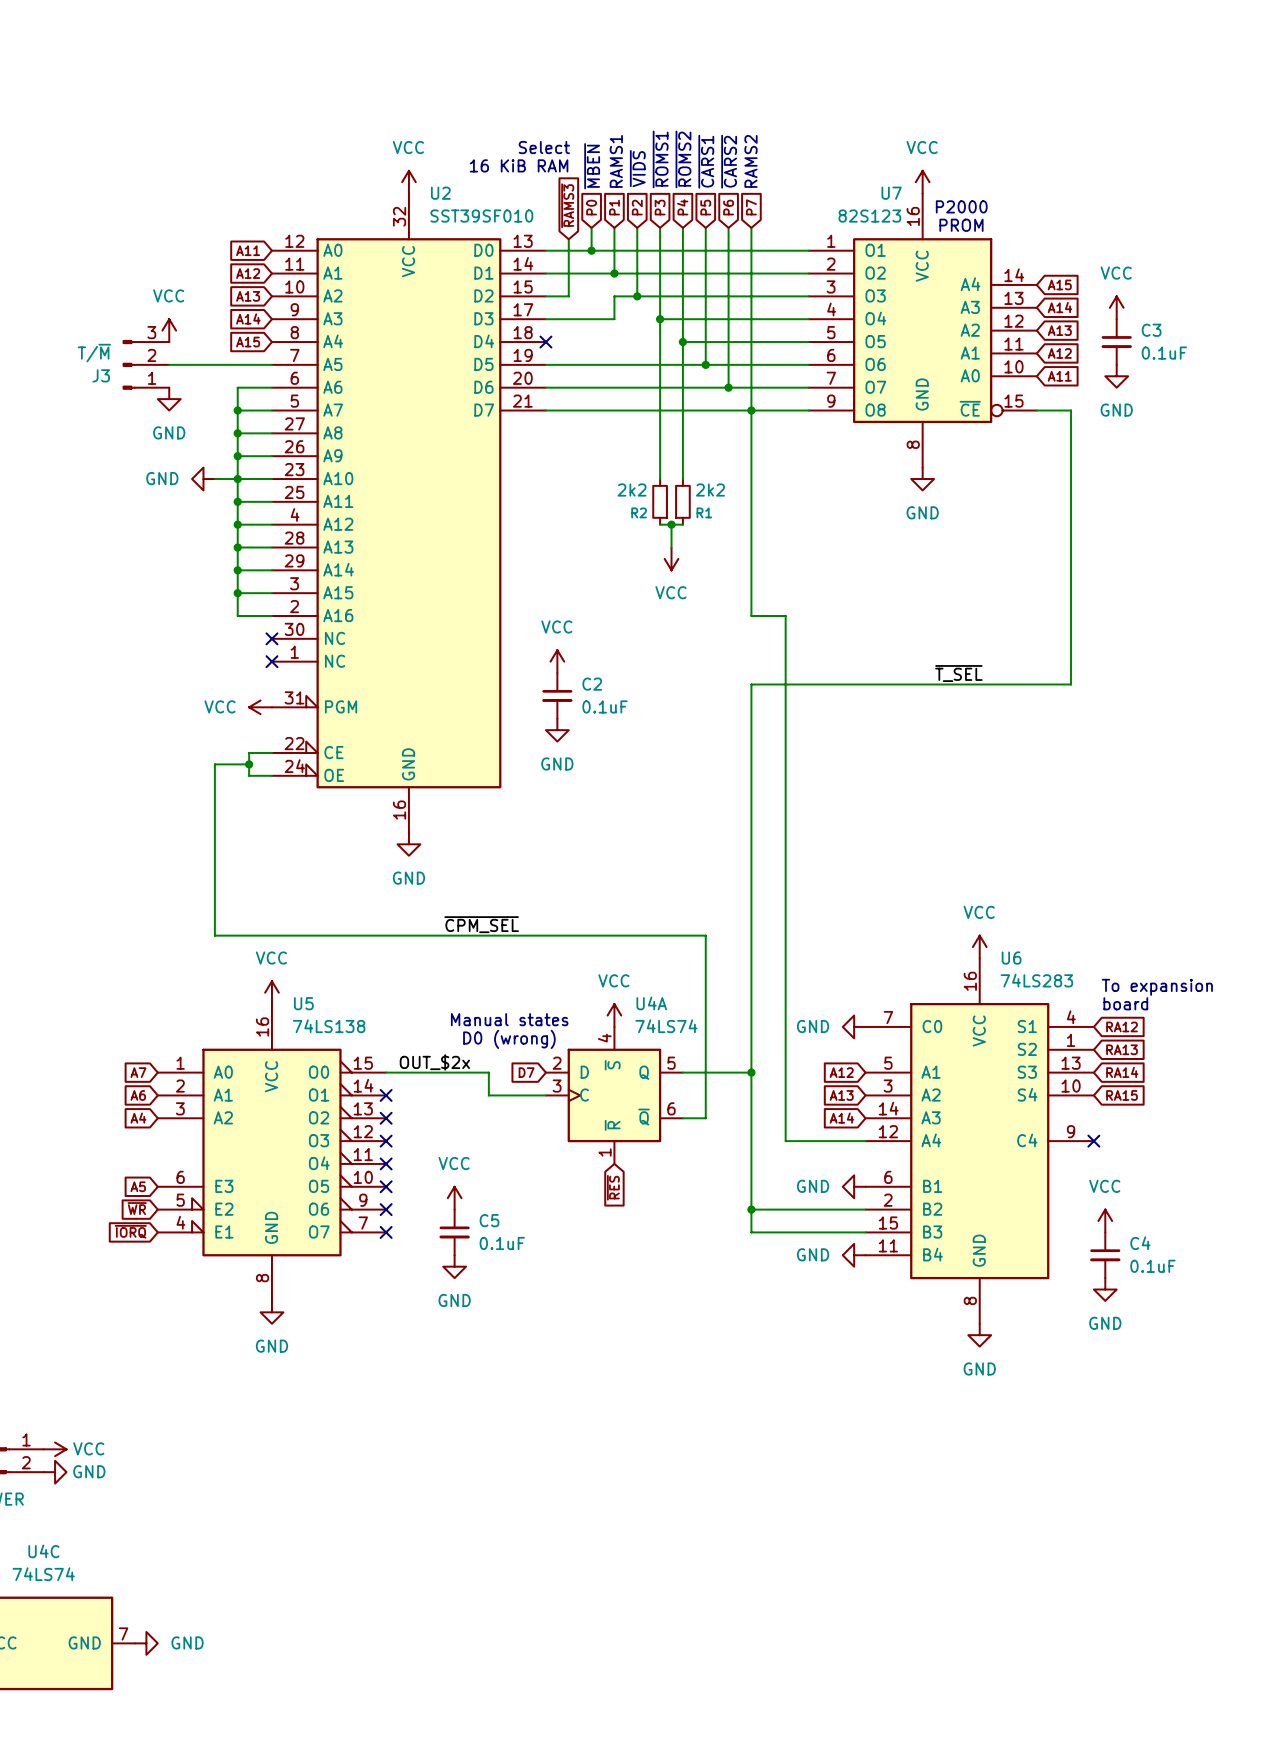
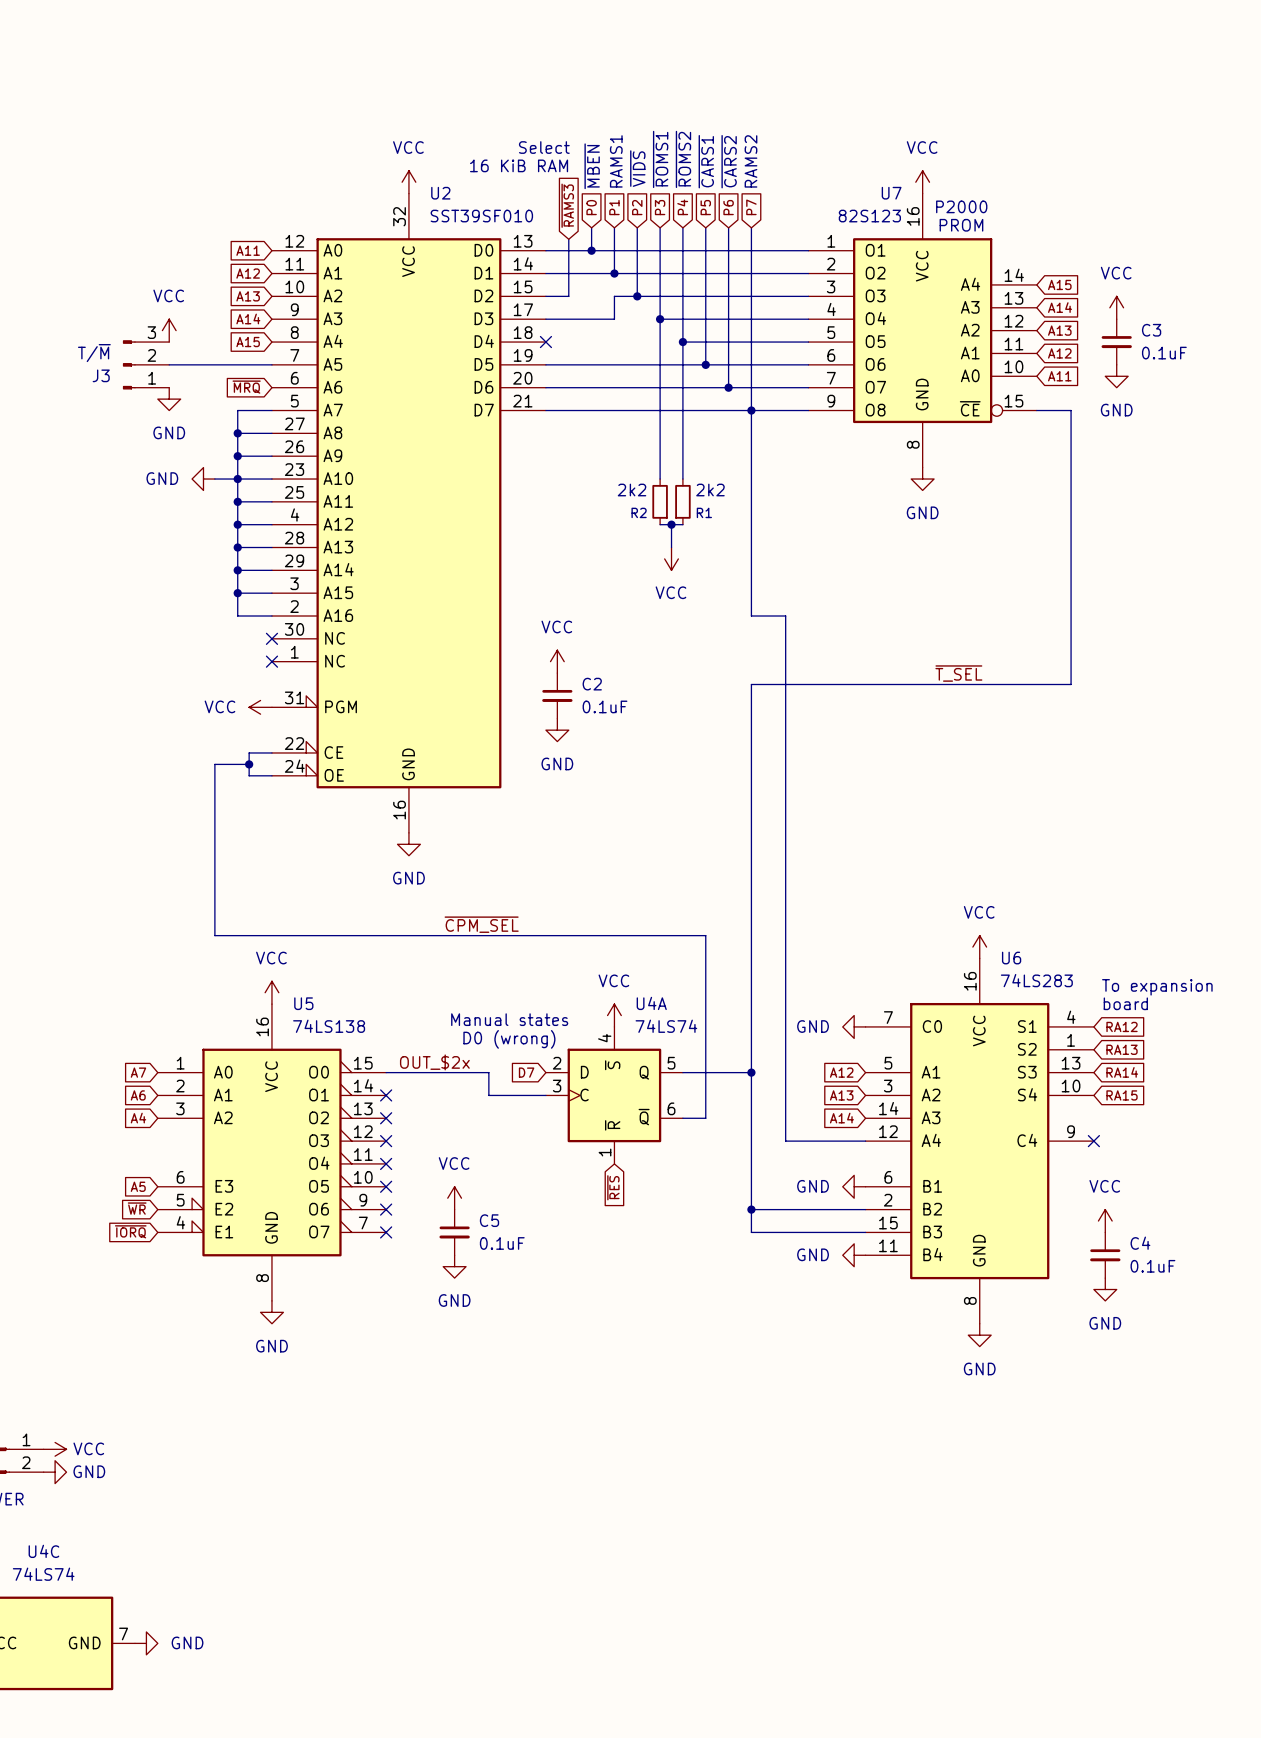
global label: none -> ~{MRQ} (246, 387)
wire: (271, 387) (237, 387) (237, 410) -> none
junction: (237, 410) -> none

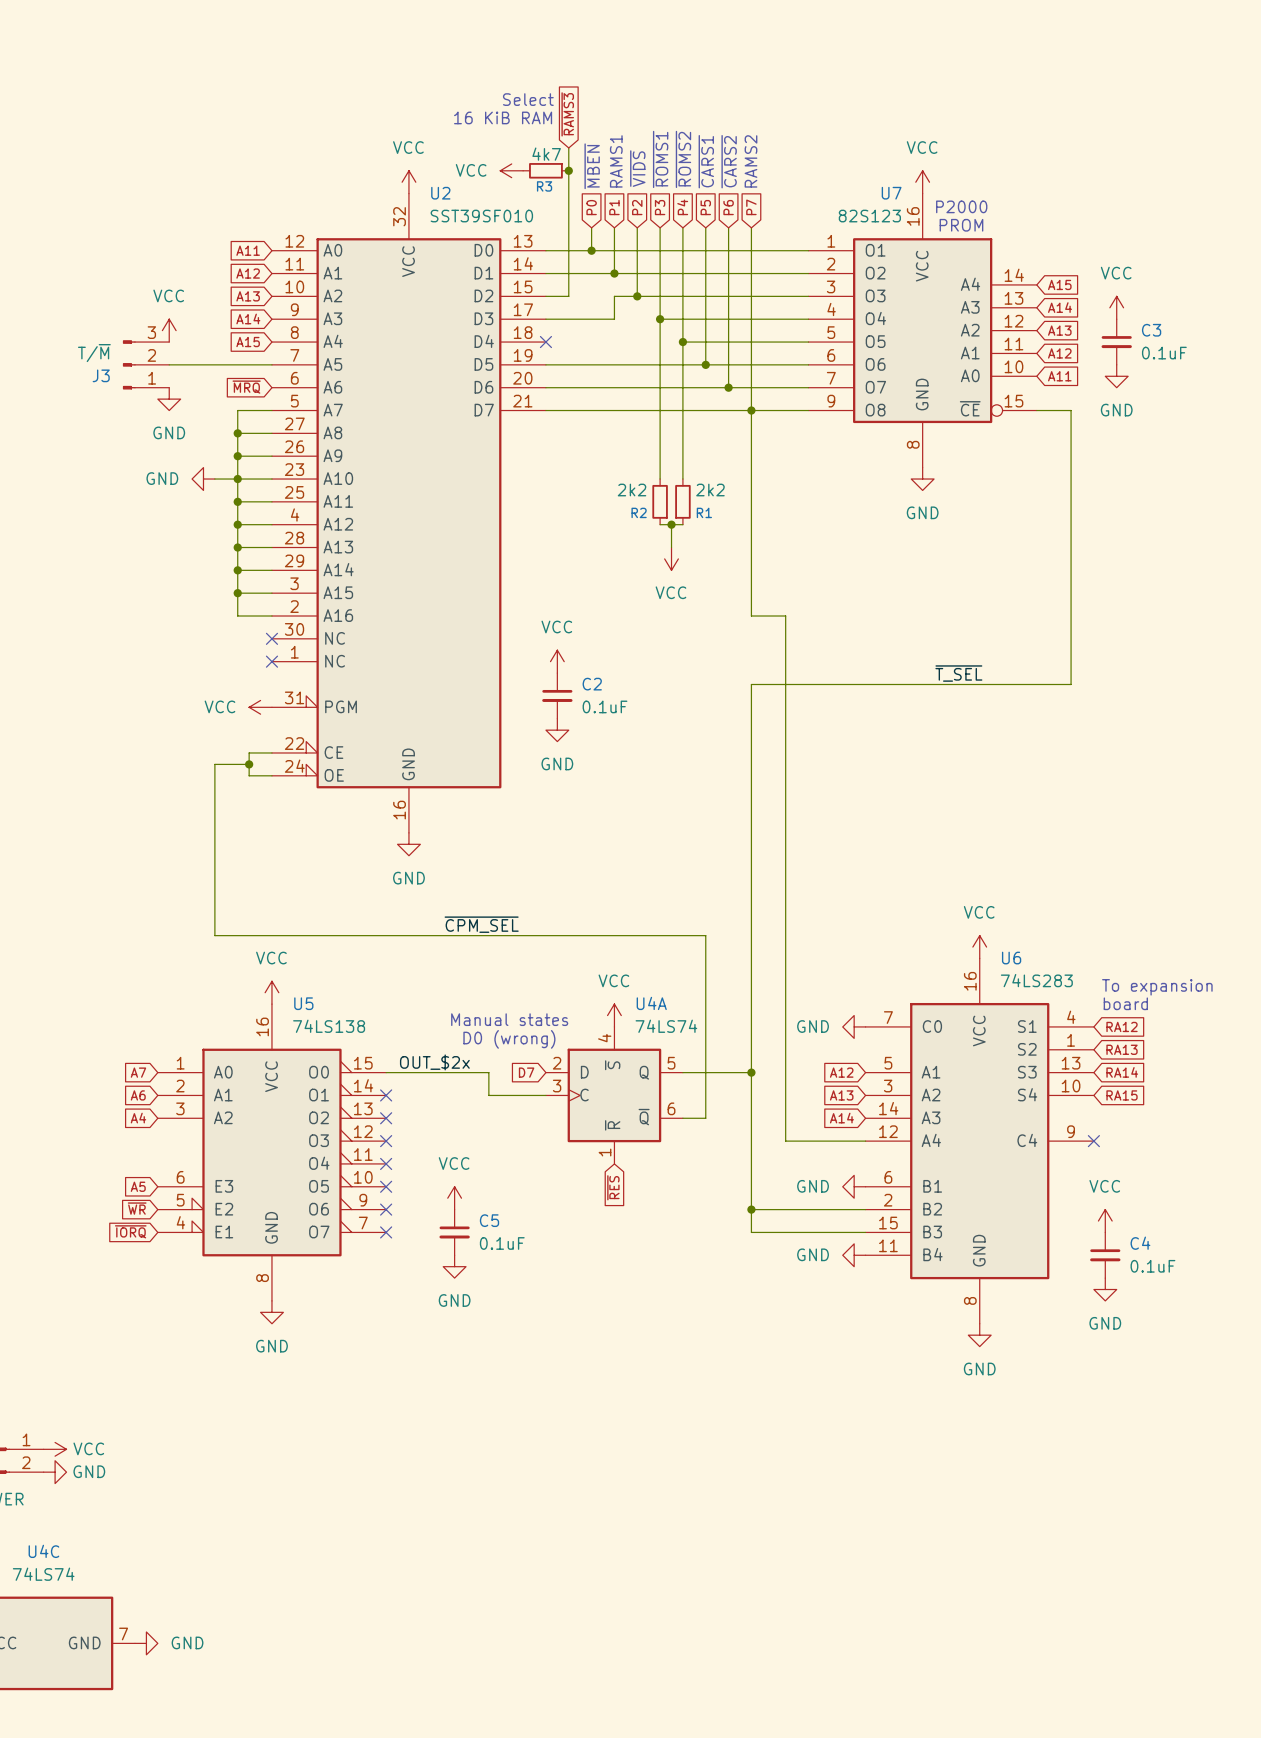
text position: Select (544, 147) -> Select (528, 99)
wire: none -> (568, 147) (568, 239)
text position: 16 KiB RAM (519, 165) -> 16 KiB RAM (503, 117)
power symbol: none -> VCC (511, 170)
R3: none -> 4k7 (545, 170)
junction: none -> (568, 170)
global label position: ~{RAMS3} (567, 205) -> ~{RAMS3} (567, 114)

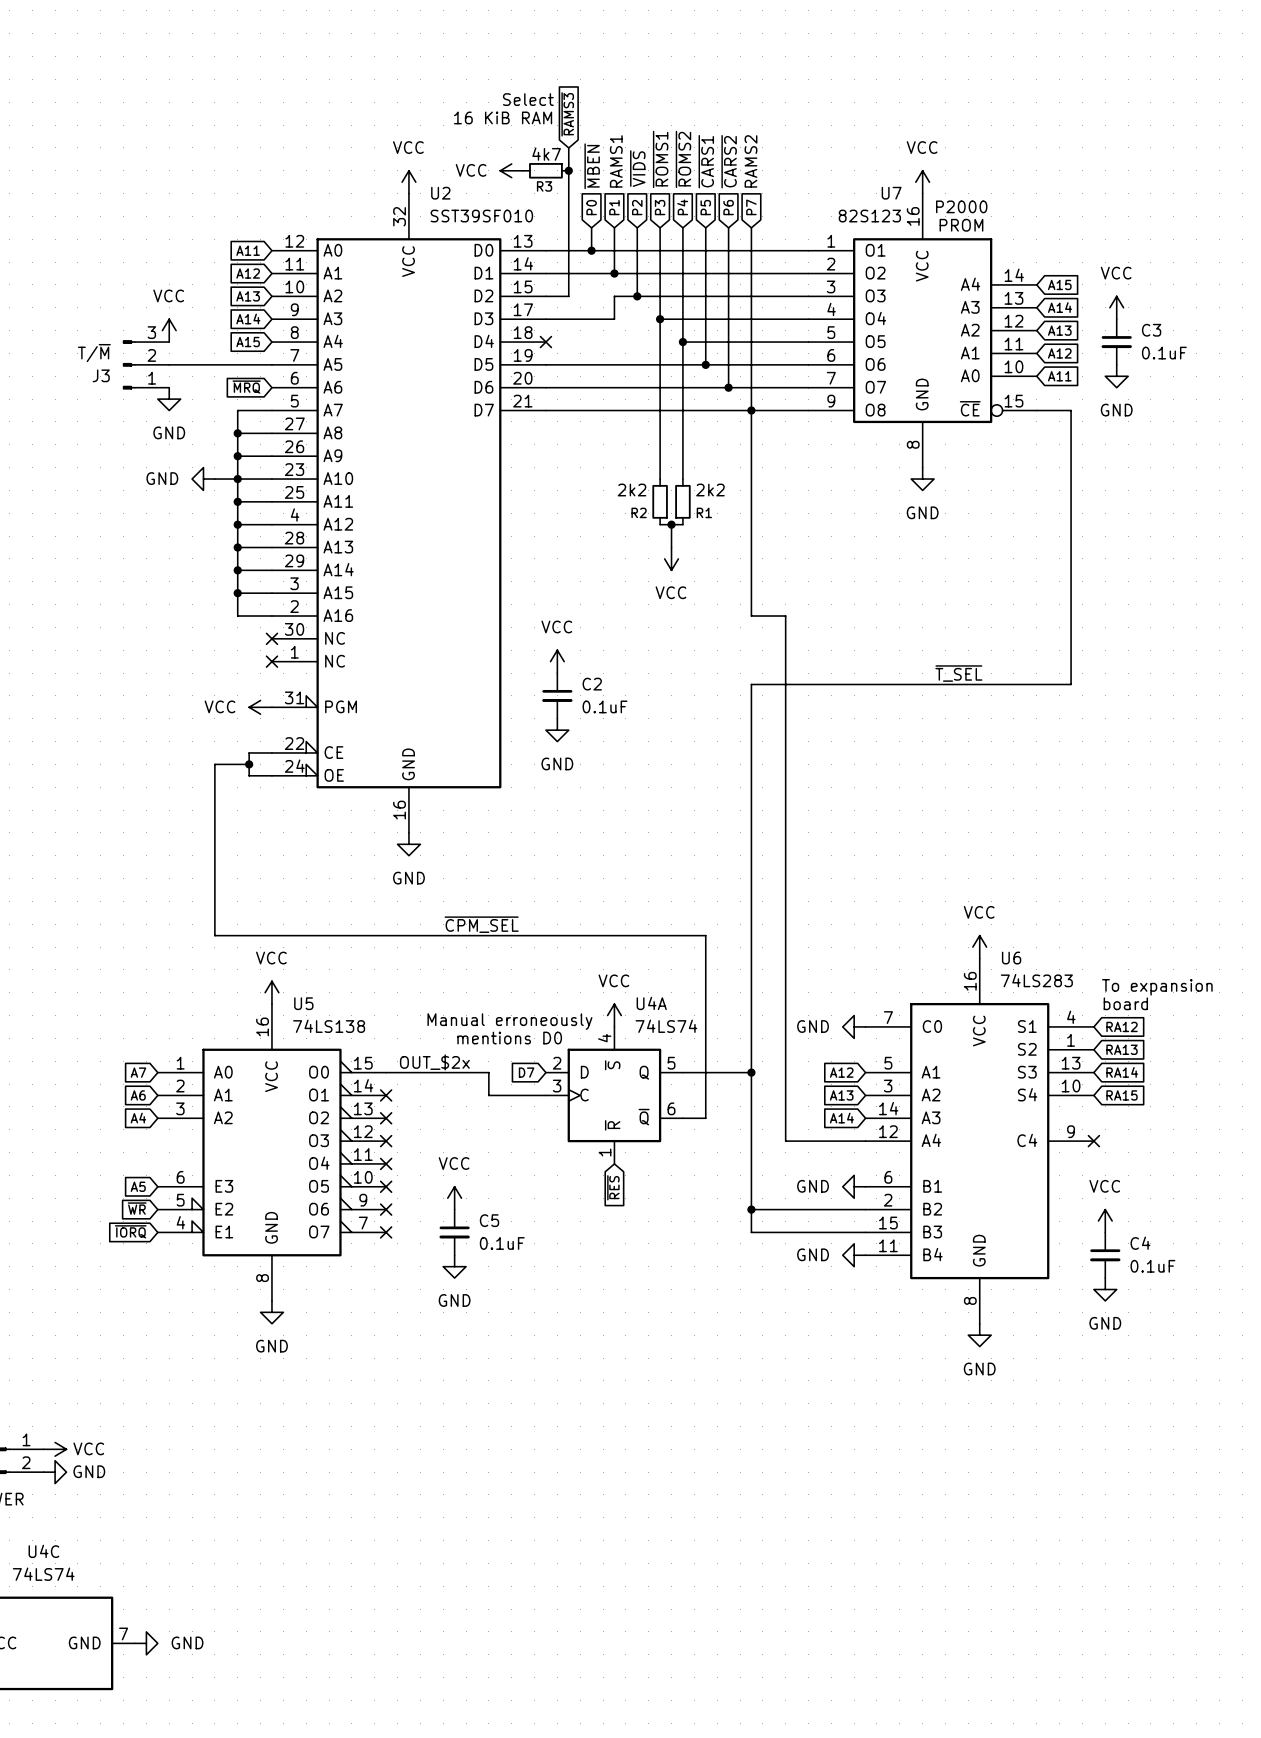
text: Manual states (509, 1019) -> Manual erroneously (509, 1021)
text: D0 (wrong) (509, 1039) -> mentions D0 (509, 1038)

